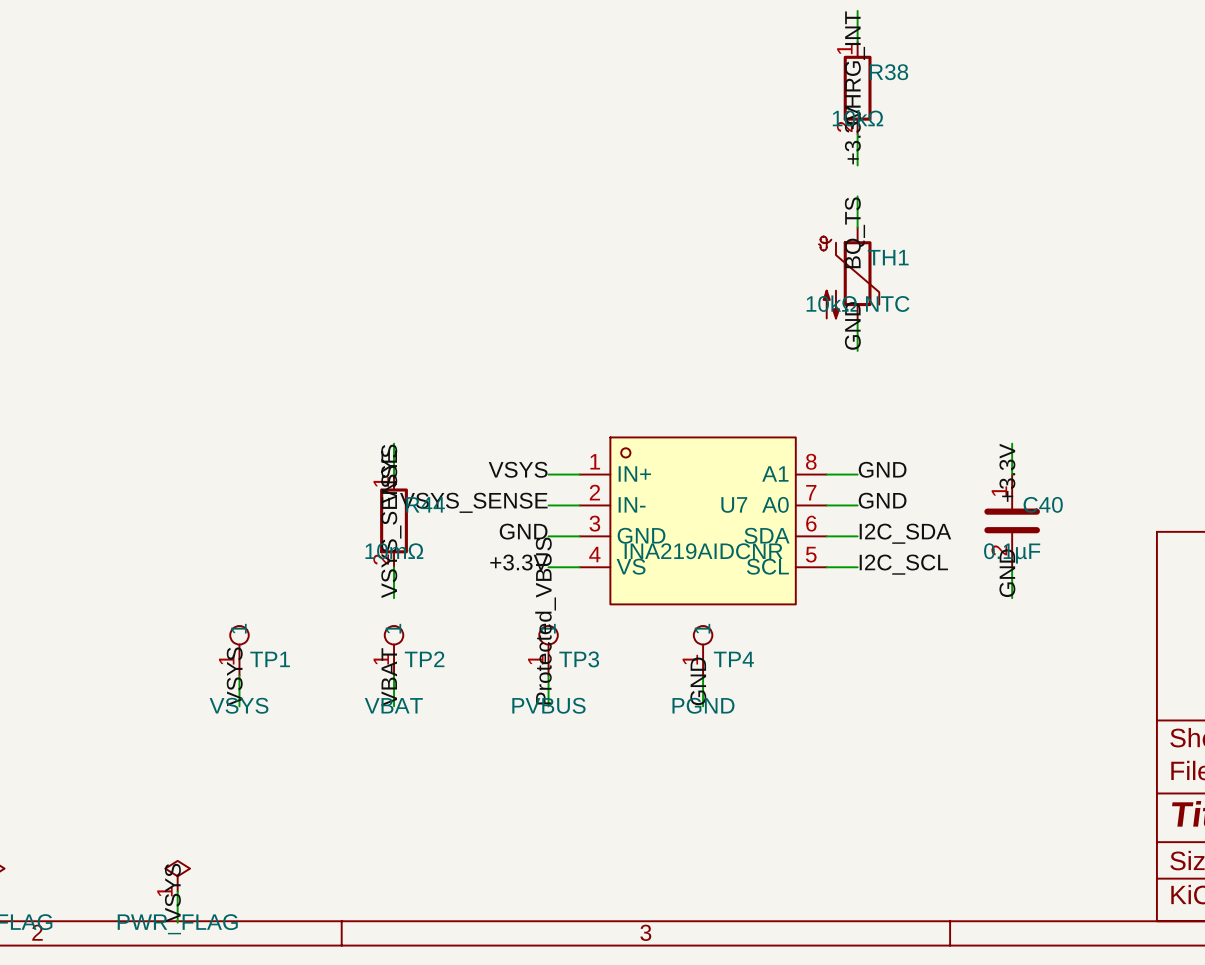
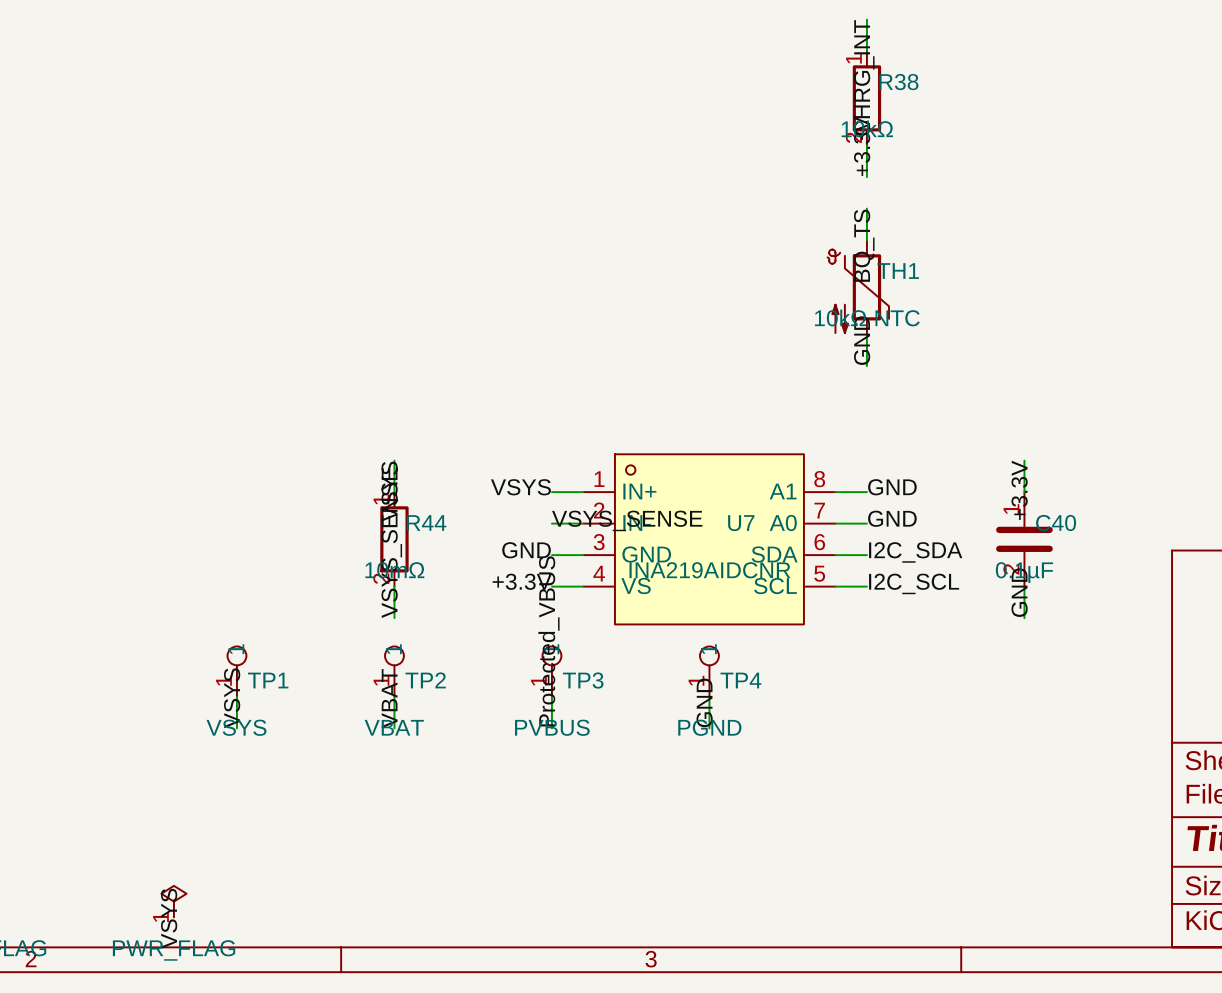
label position: VSYS_SENSE (473, 502) -> VSYS_SENSE (627, 520)
wire: (177, 891) (177, 922) -> none

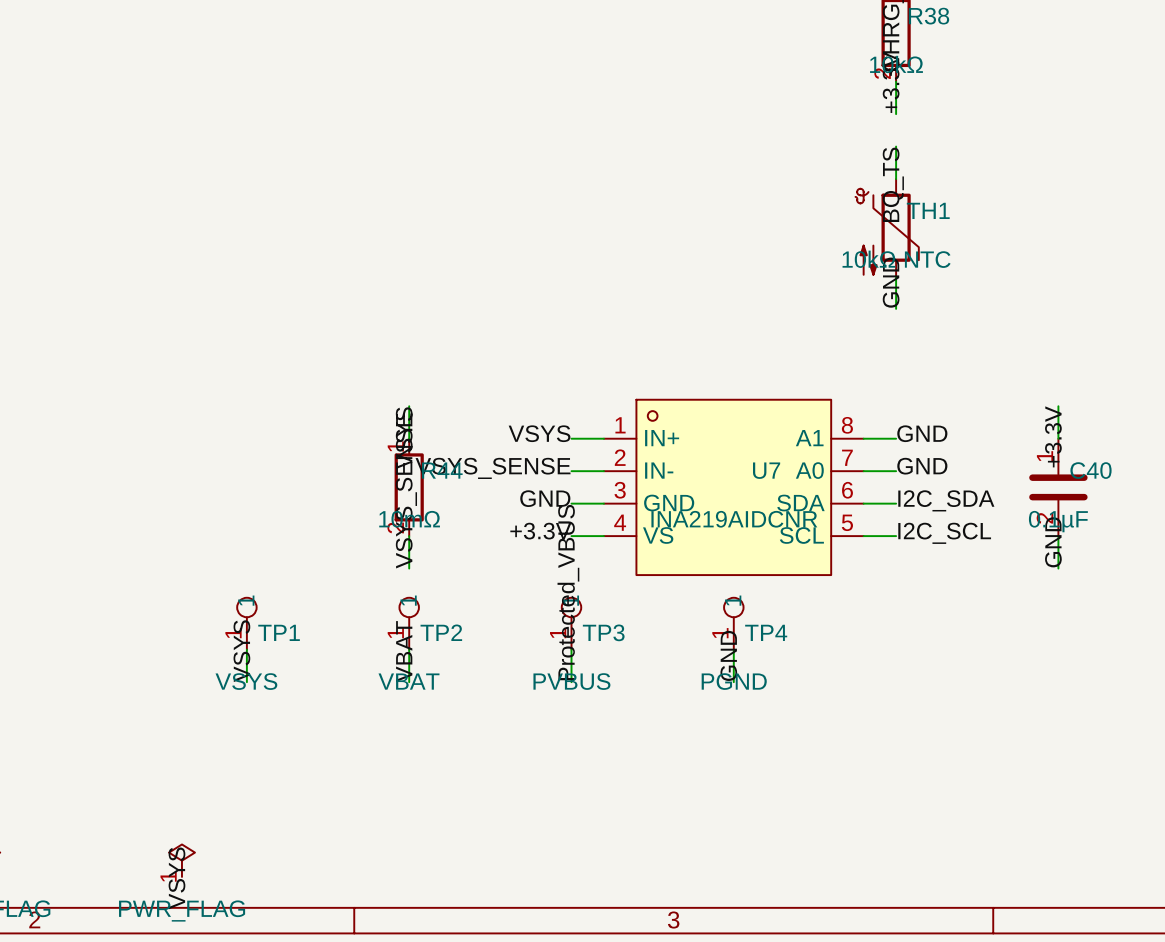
label position: VSYS_SENSE (627, 520) -> VSYS_SENSE (493, 468)

